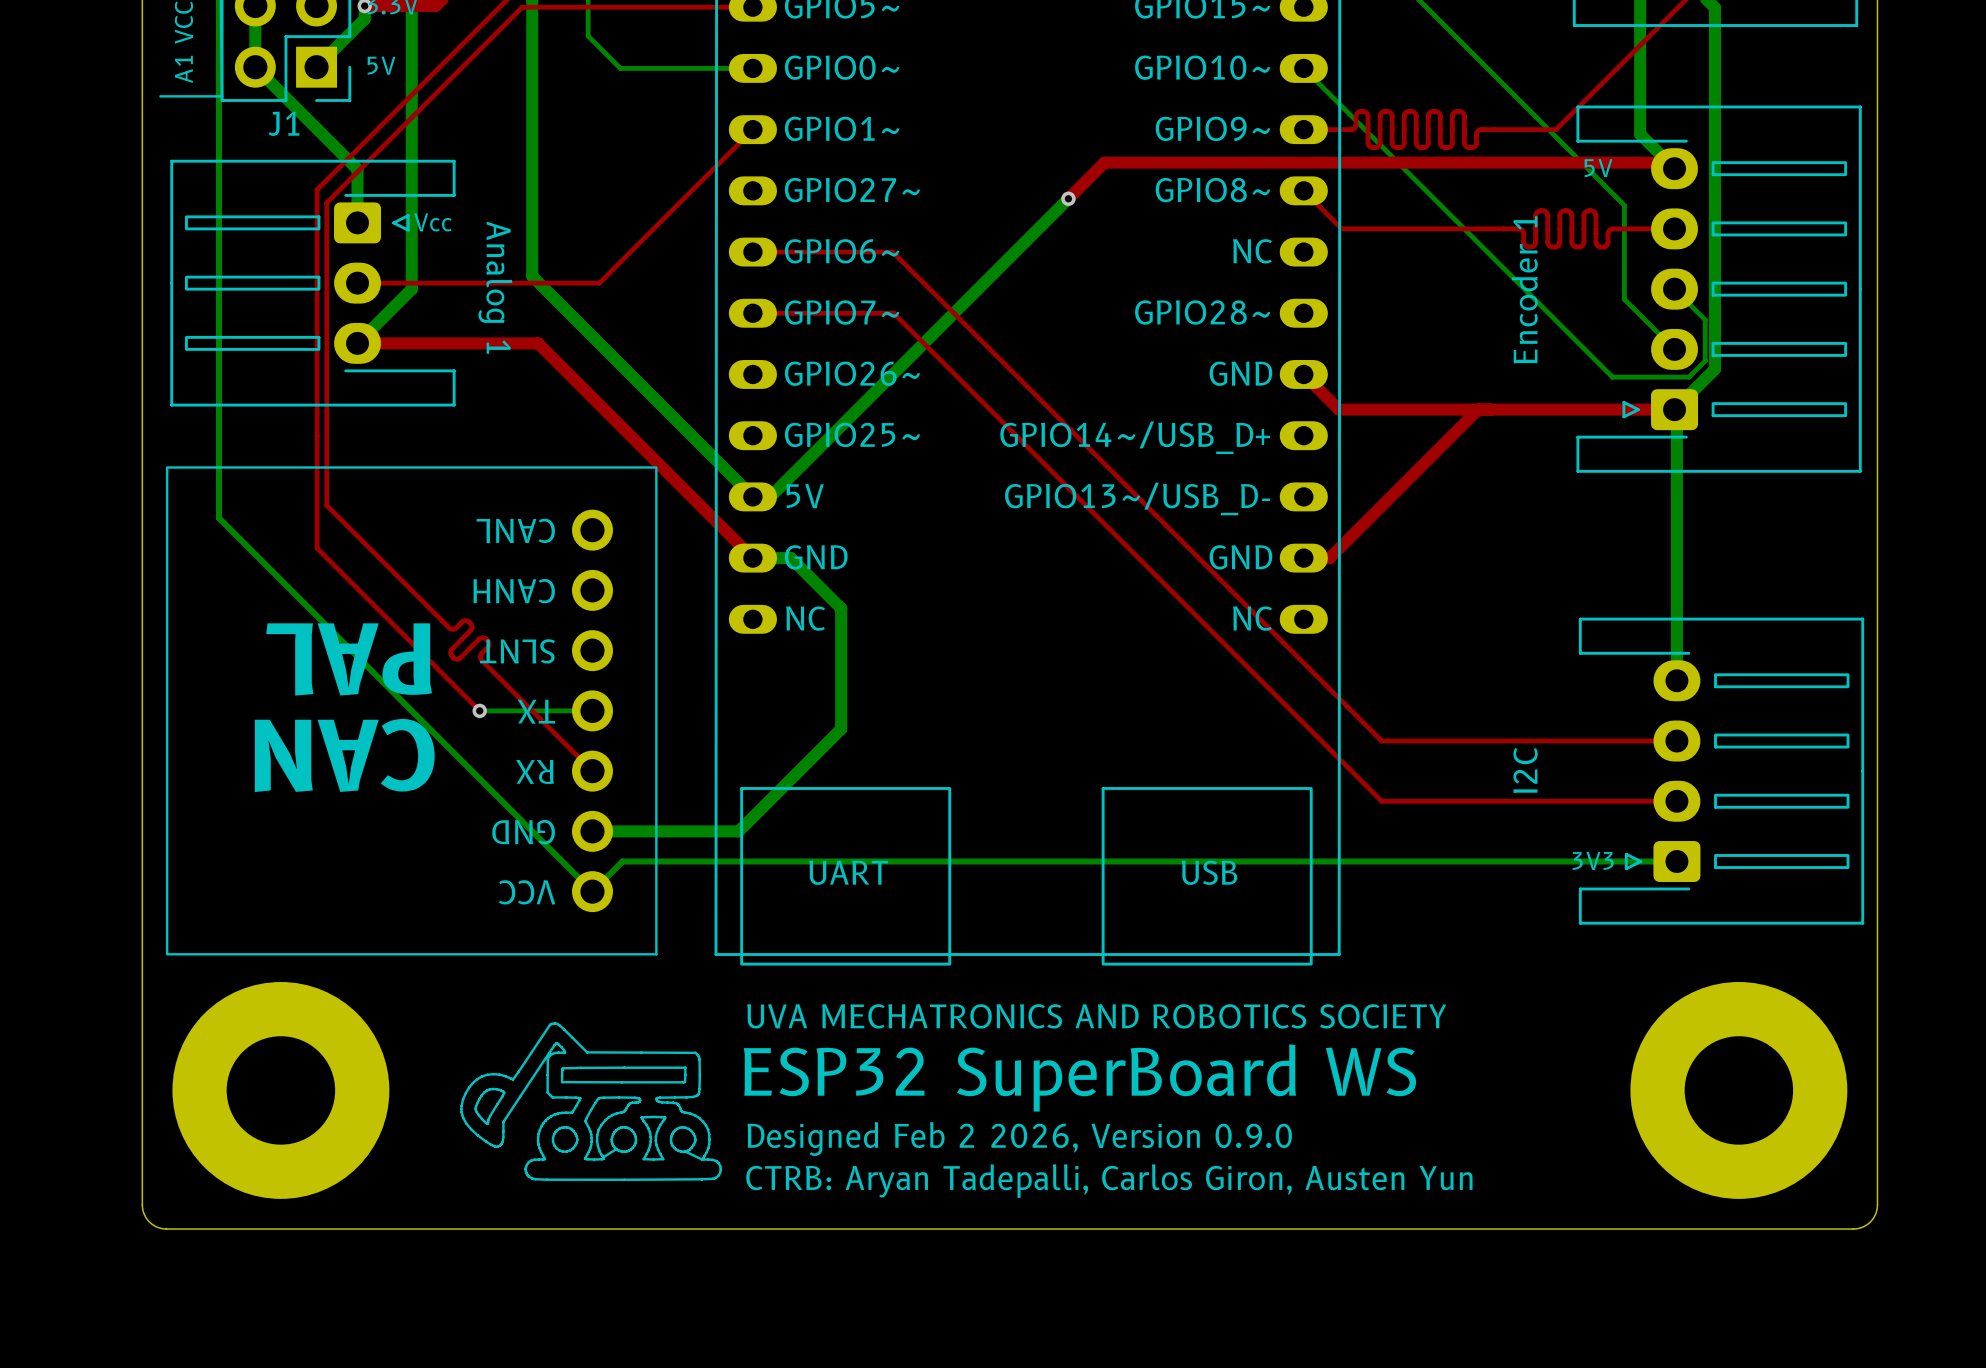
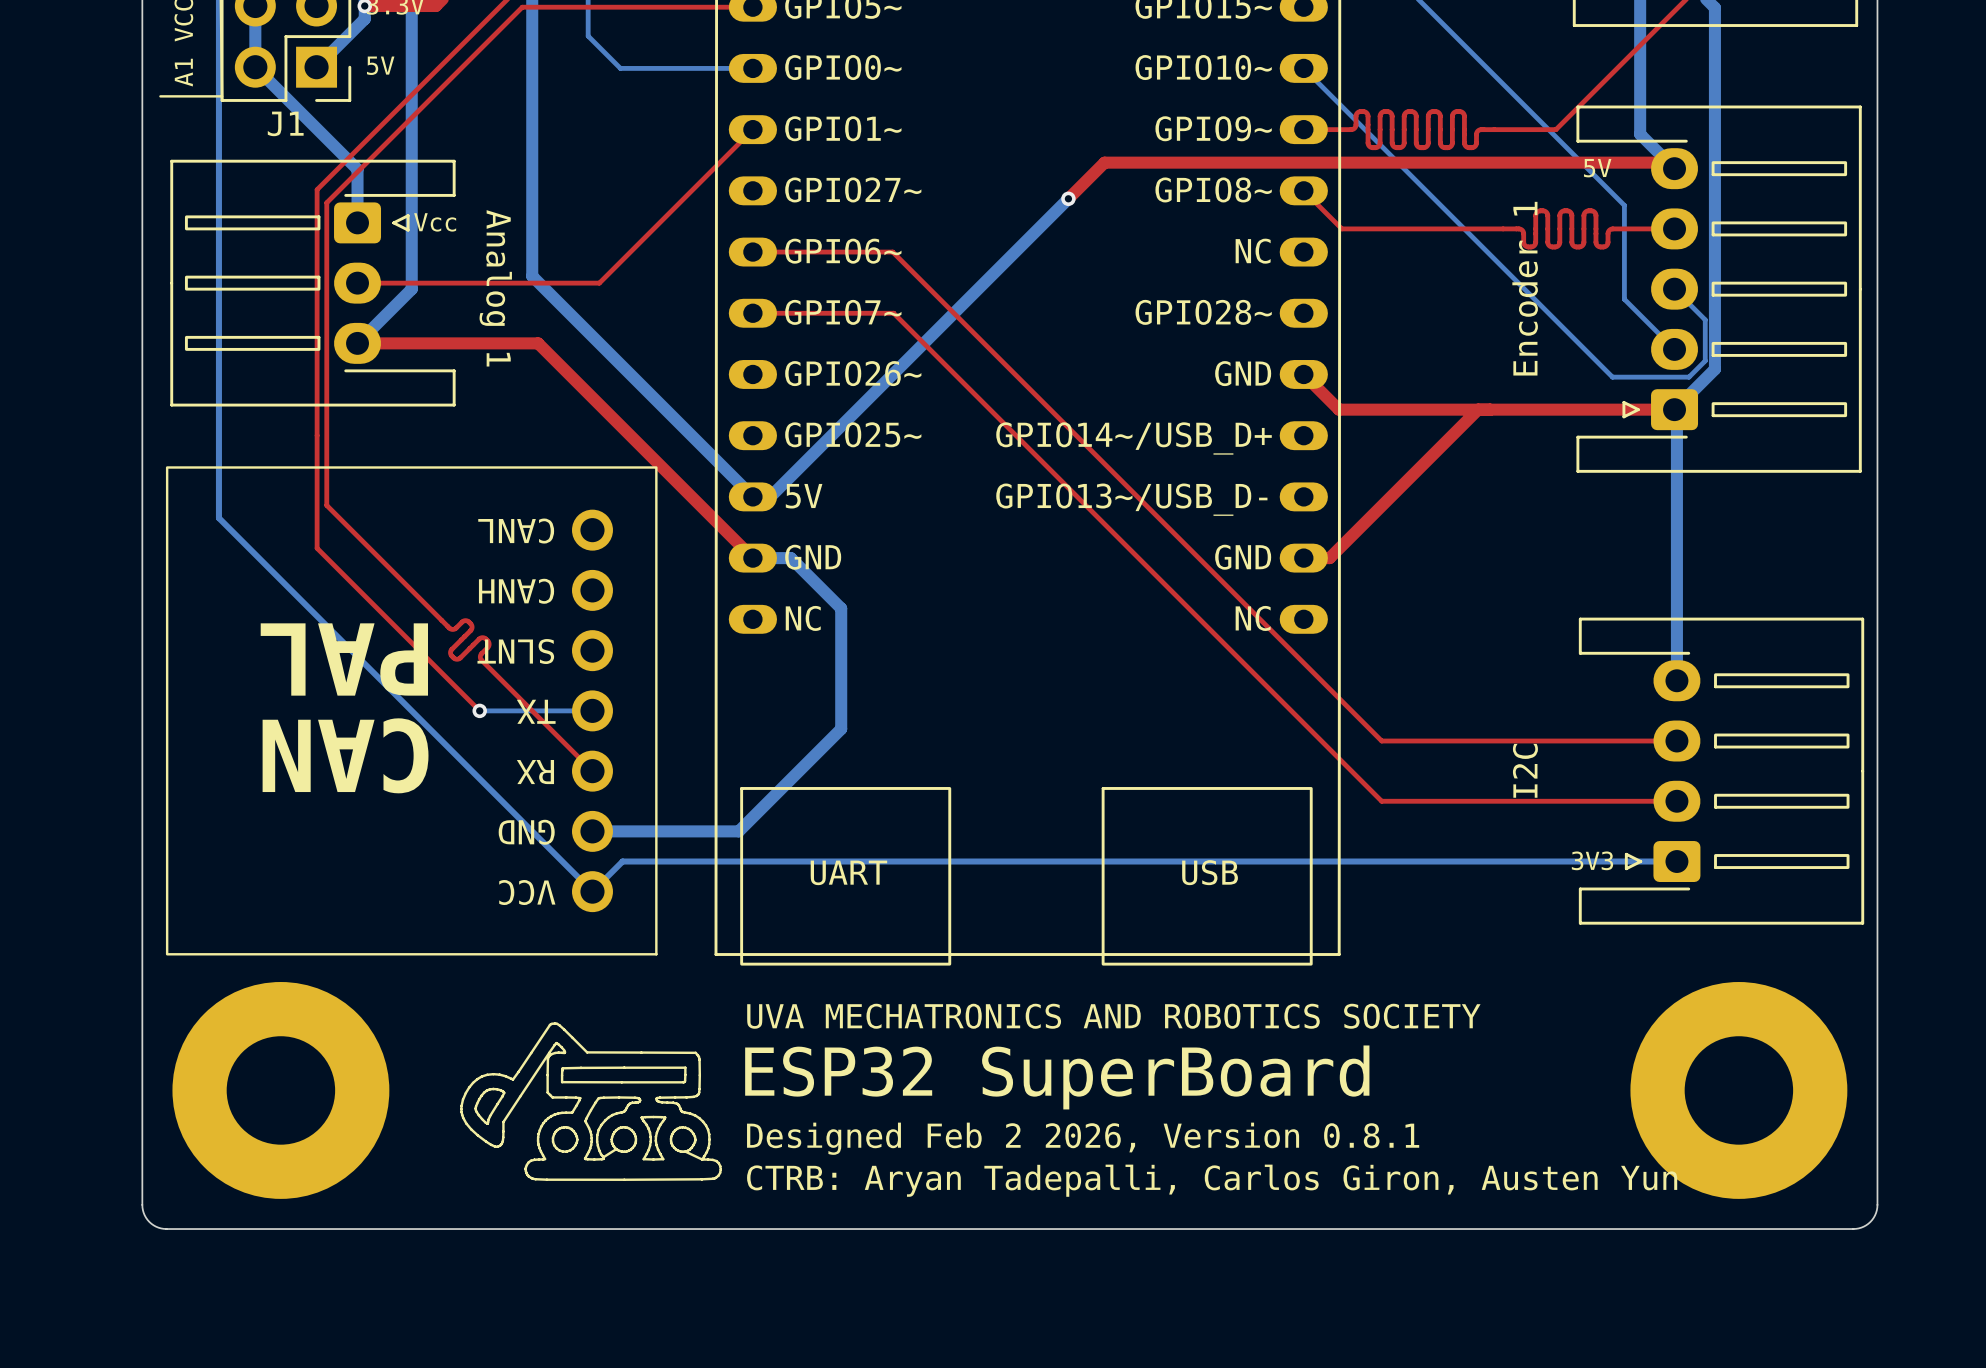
text: ESP32 SuperBoard WS (1079, 1077) -> ESP32 SuperBoard (1057, 1077)
text: Designed Feb 2 2026, Version 0.9.0 (1019, 1139) -> Designed Feb 2 2026, Version 0.8.1 (1083, 1138)

